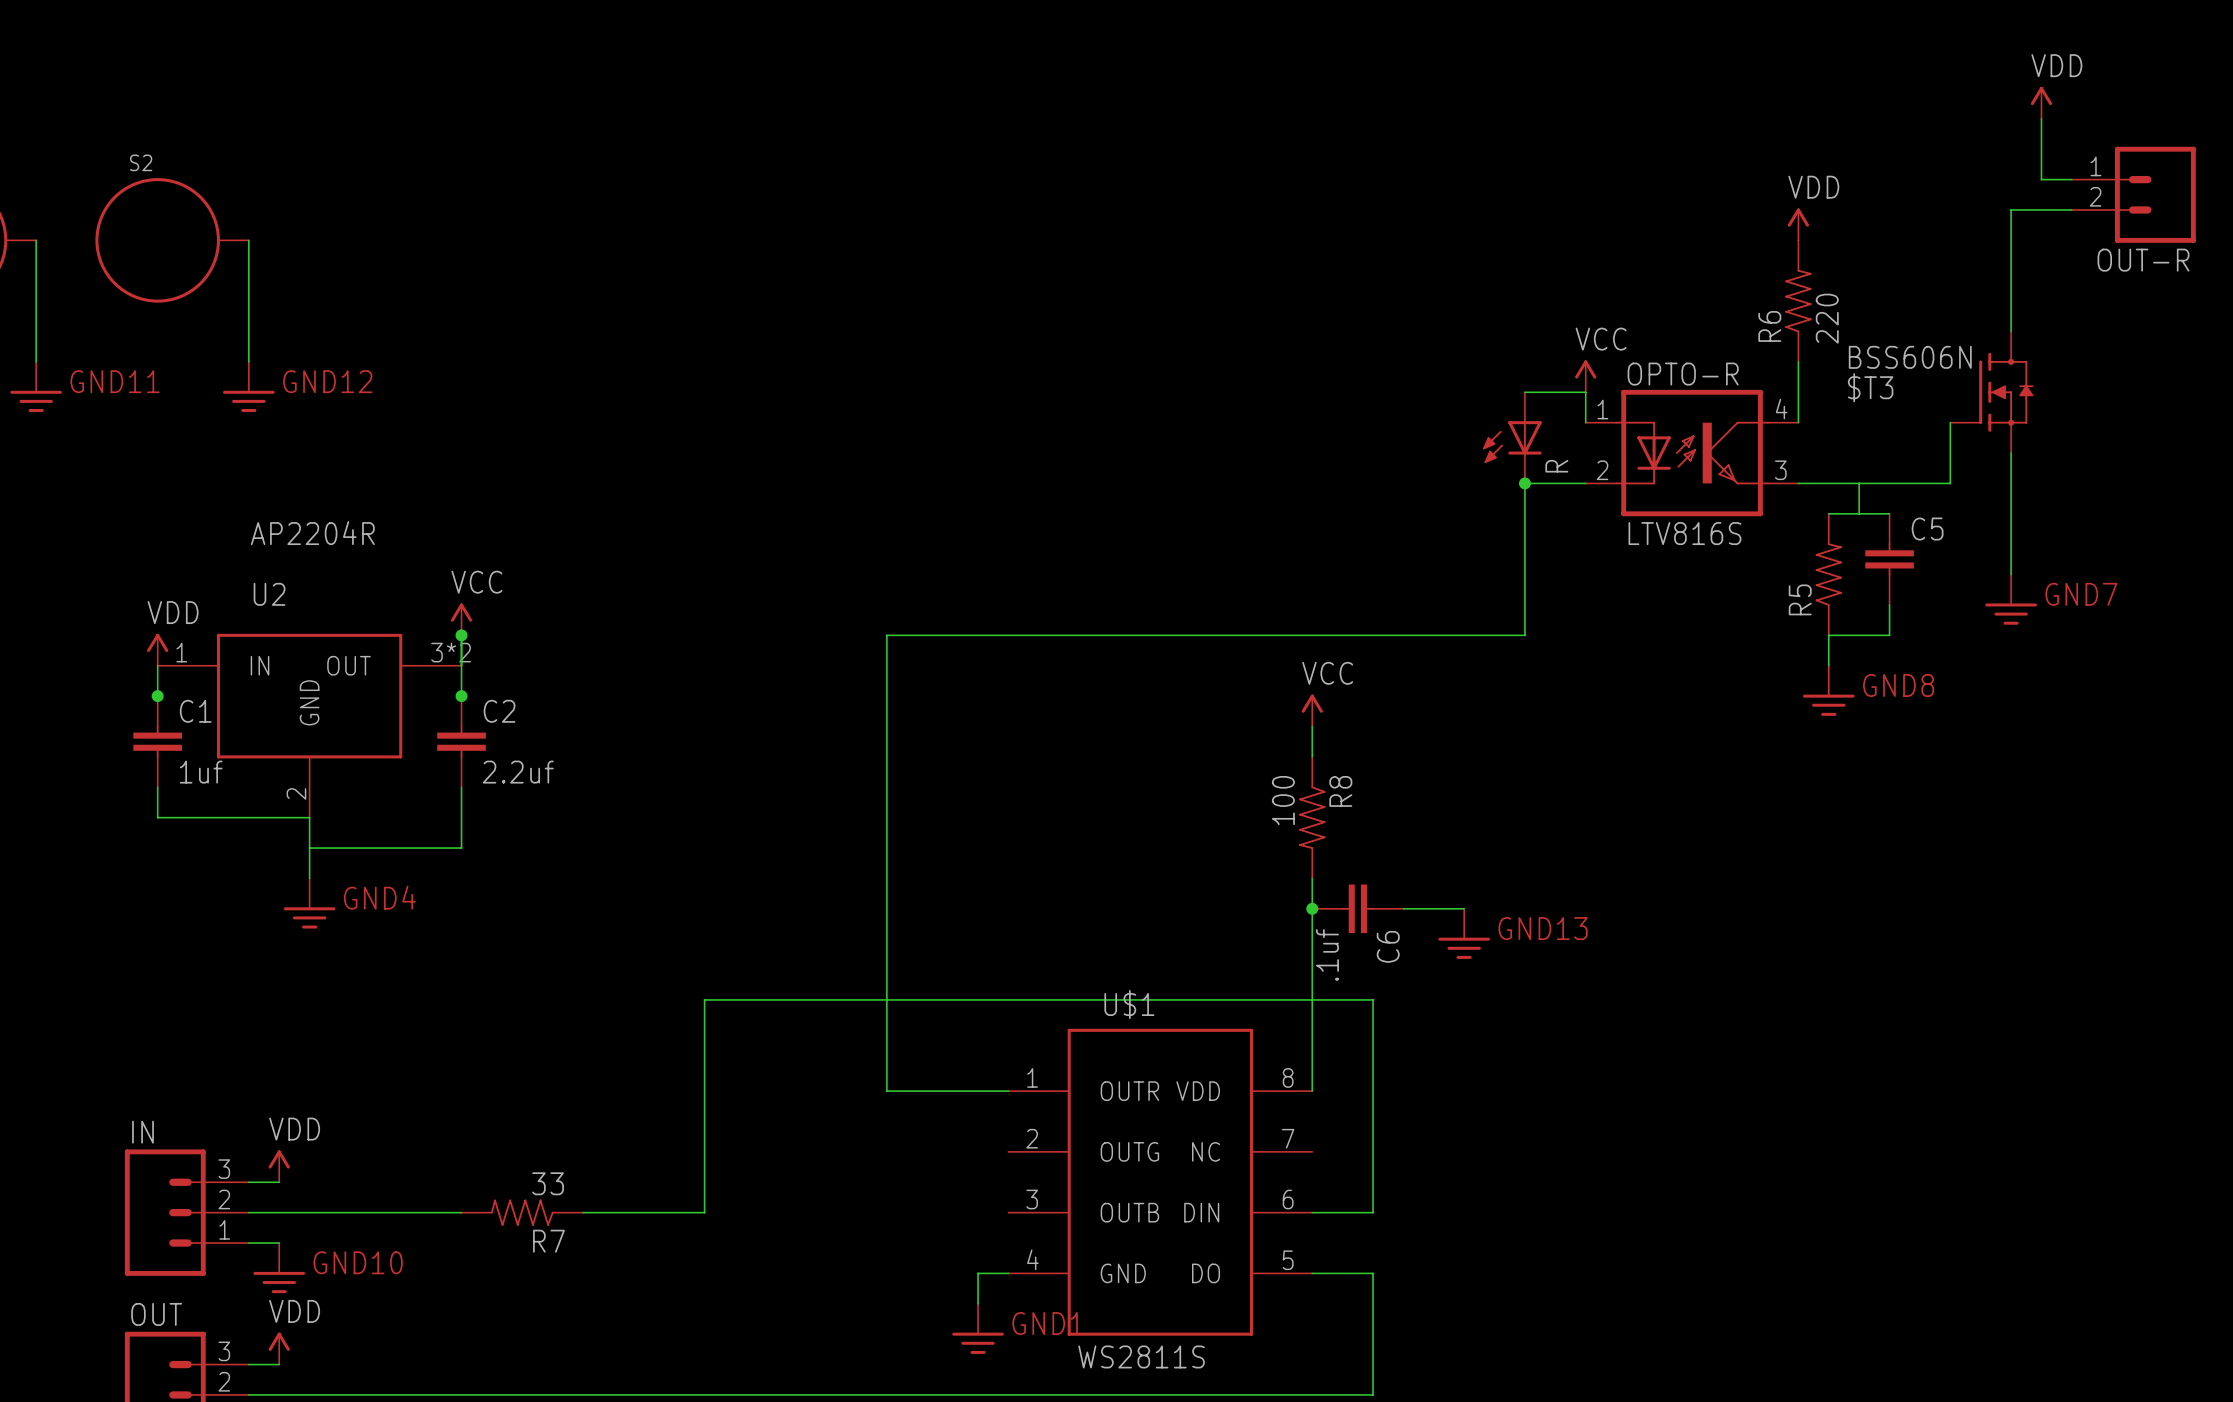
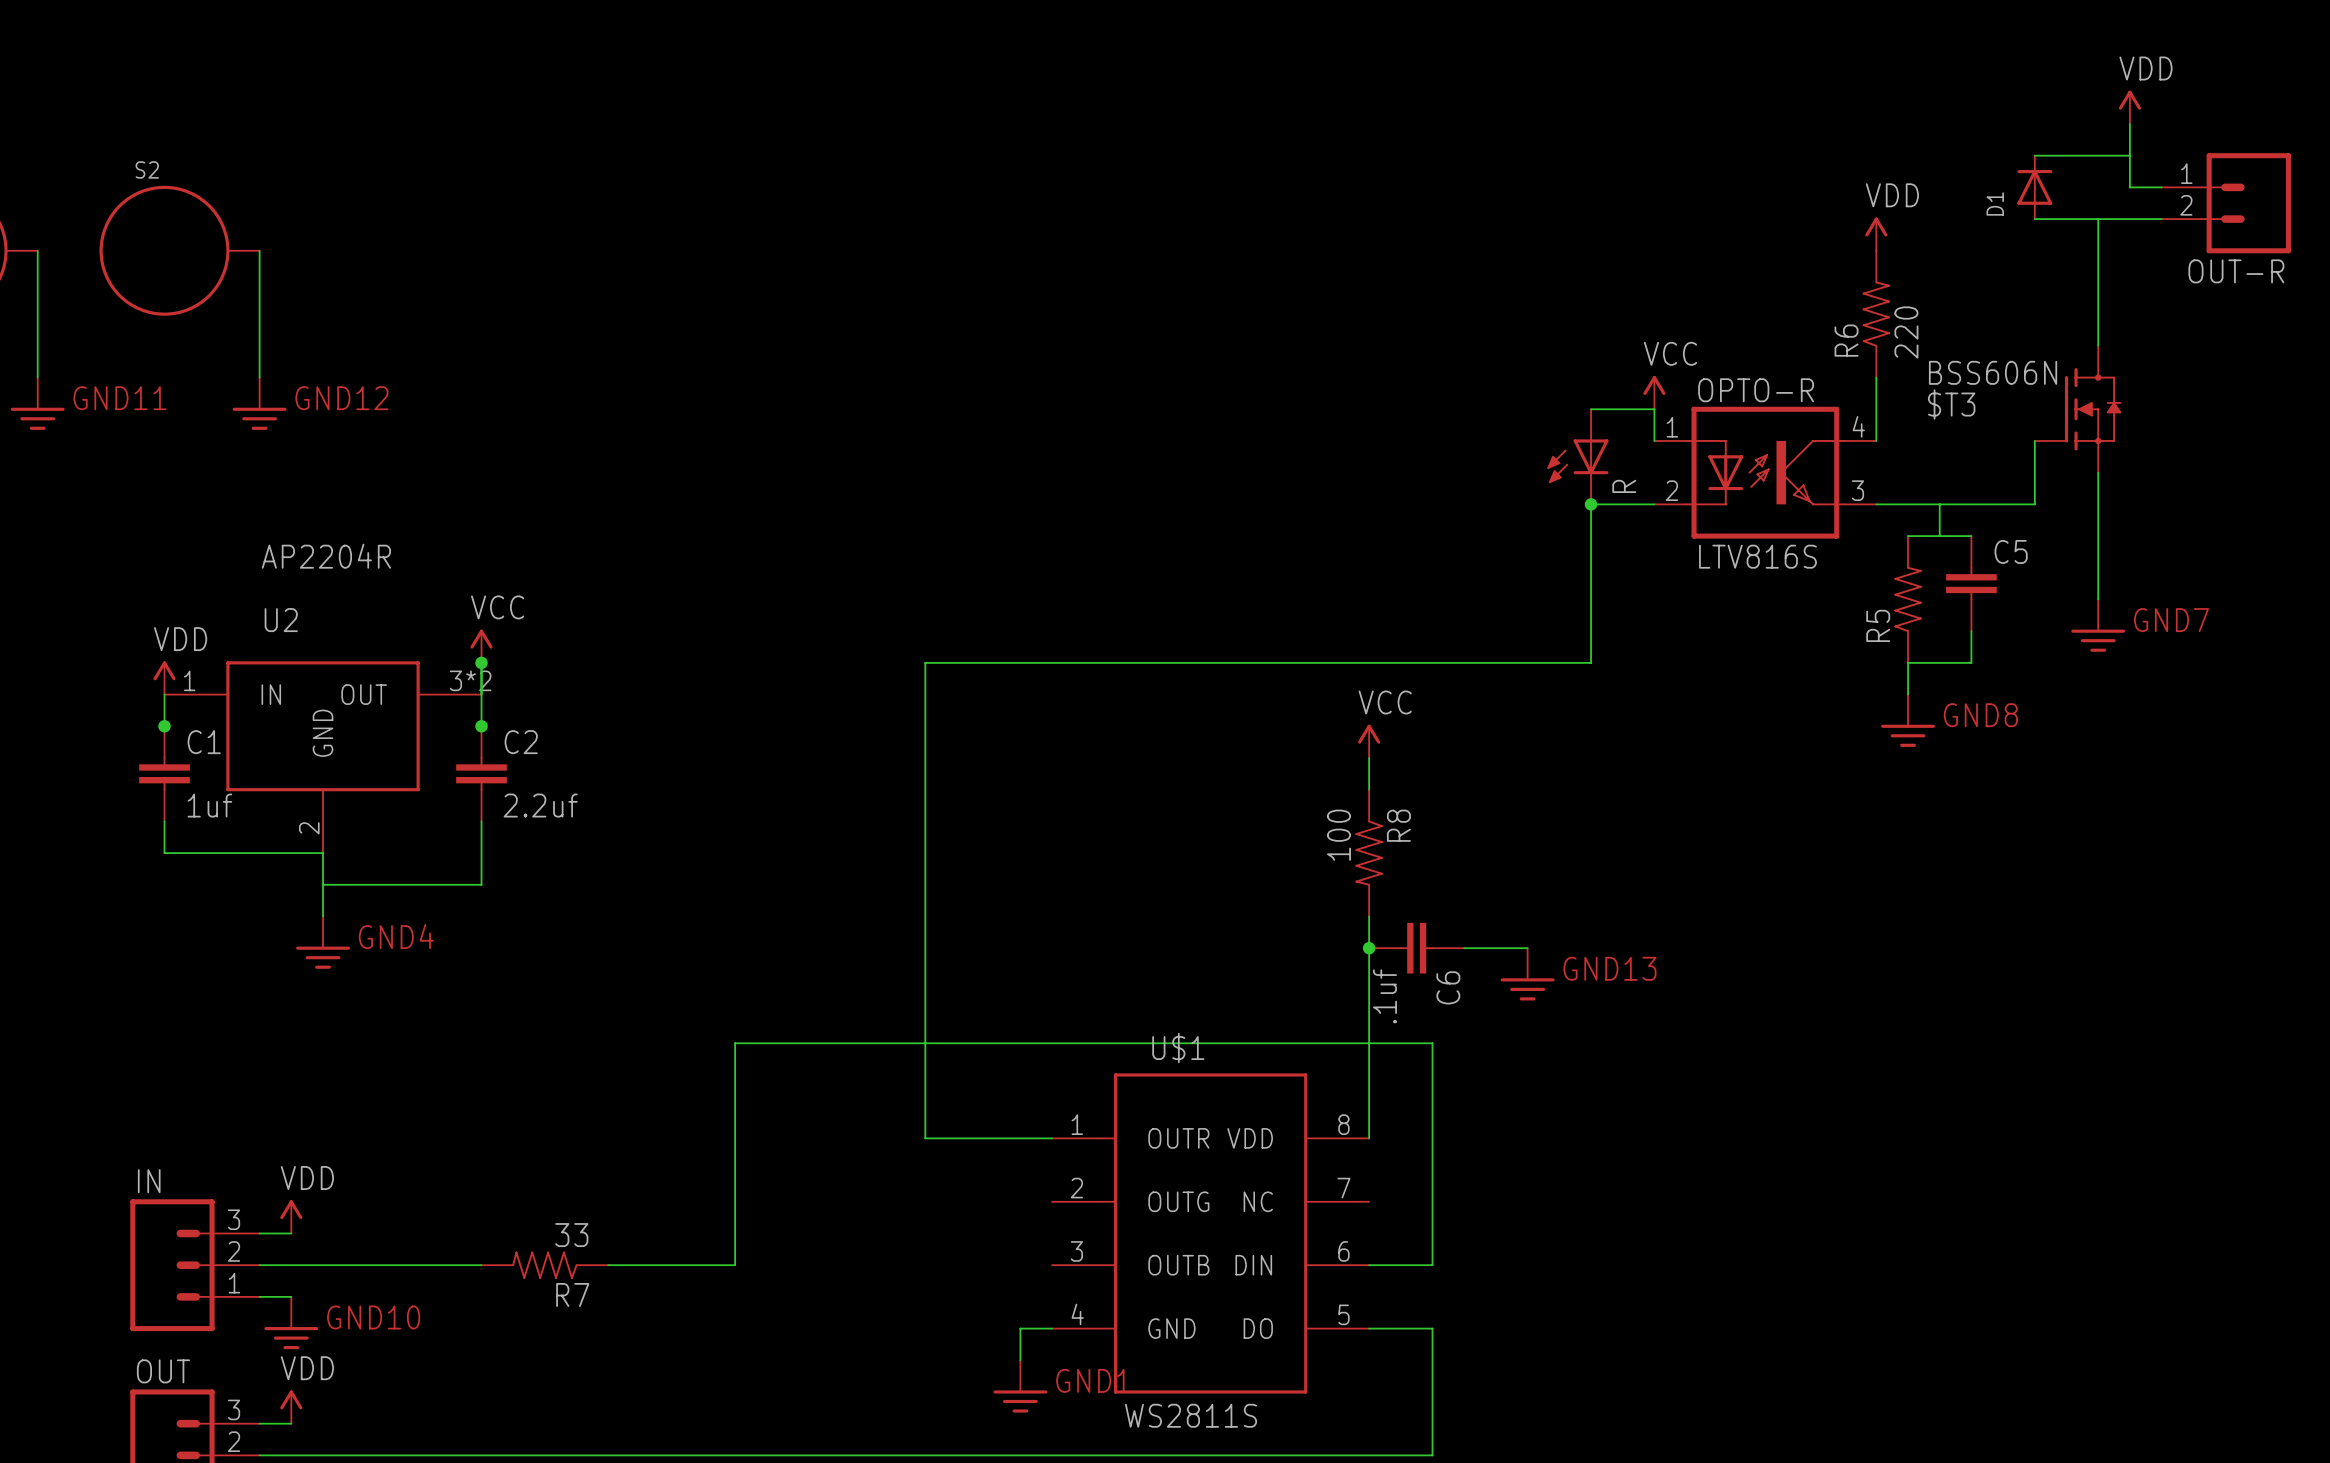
wire: none -> (2034, 155) (2129, 155)
D1: none -> (2034, 187)
wire: none -> (2034, 219) (2098, 219)

